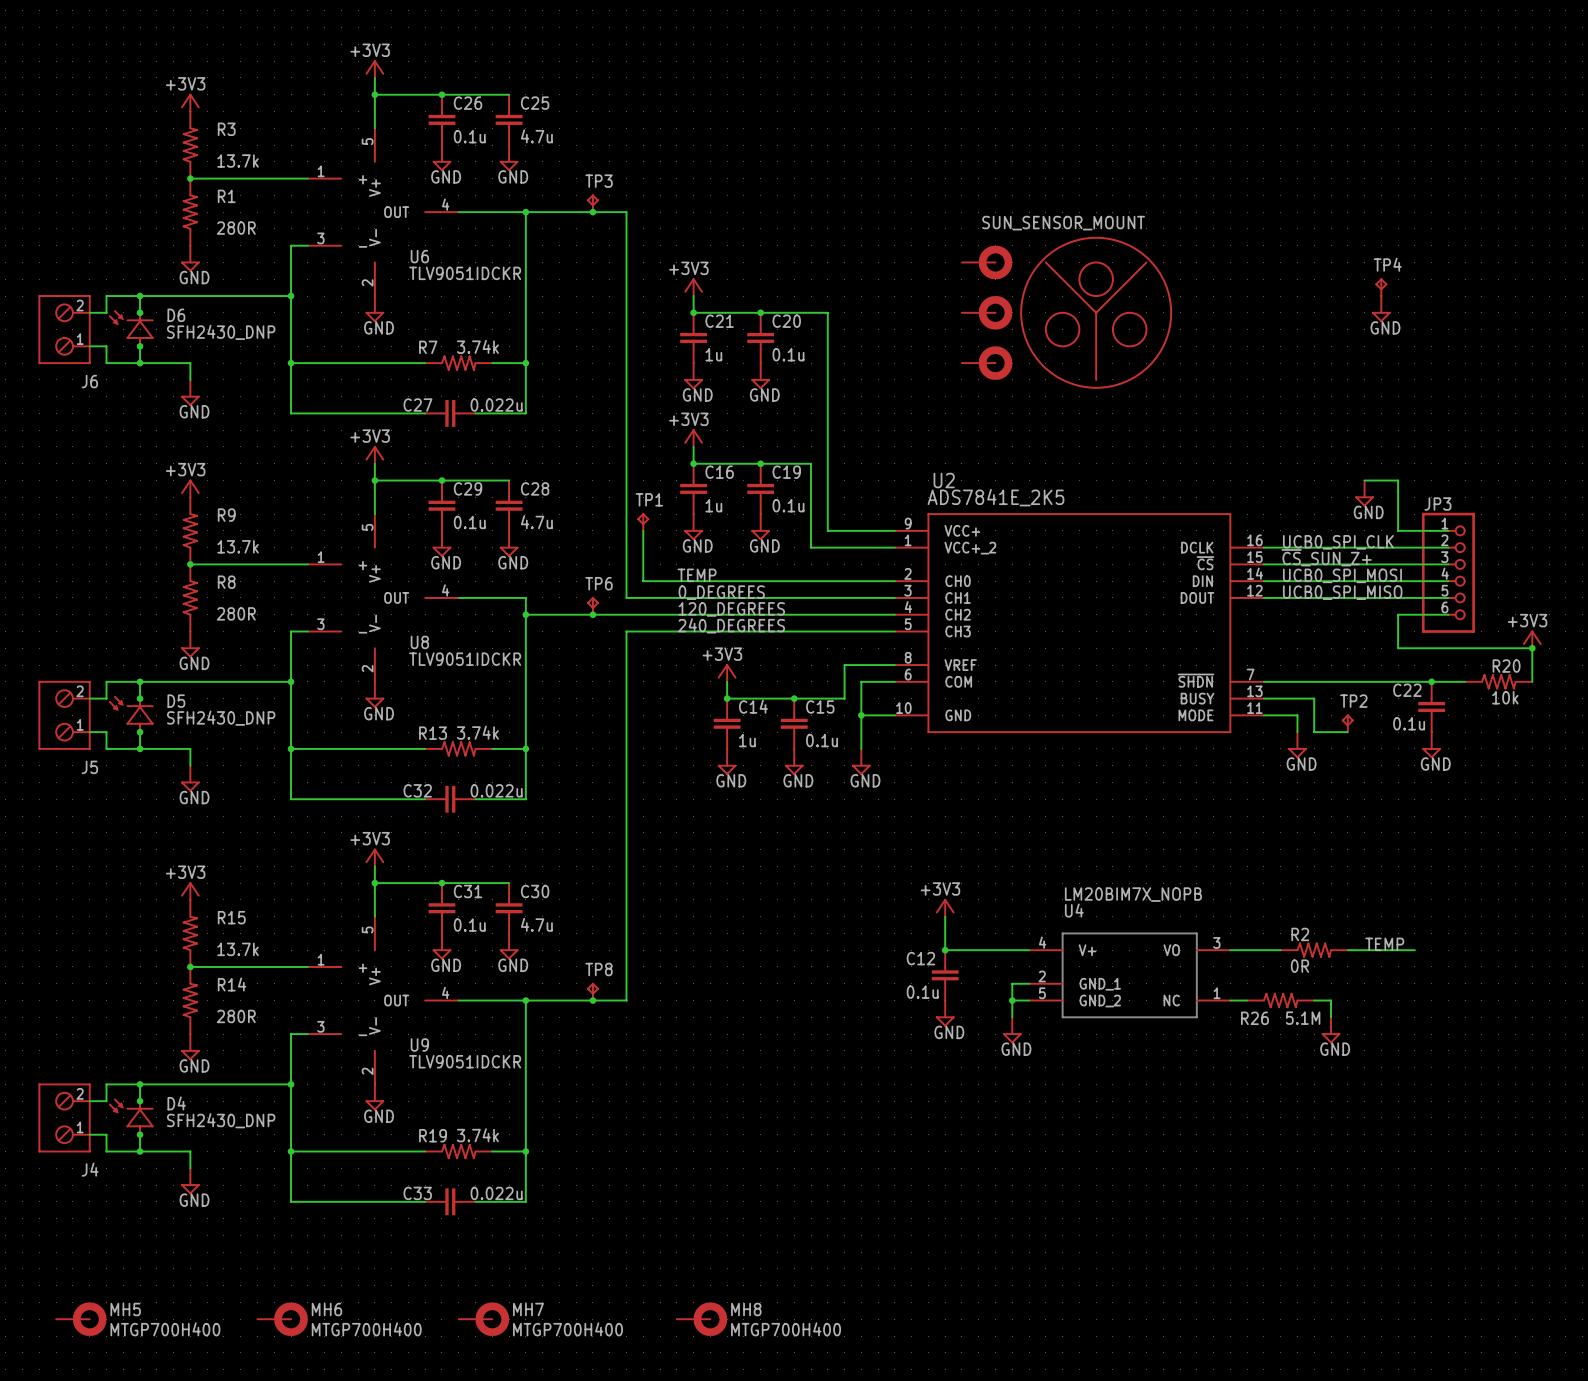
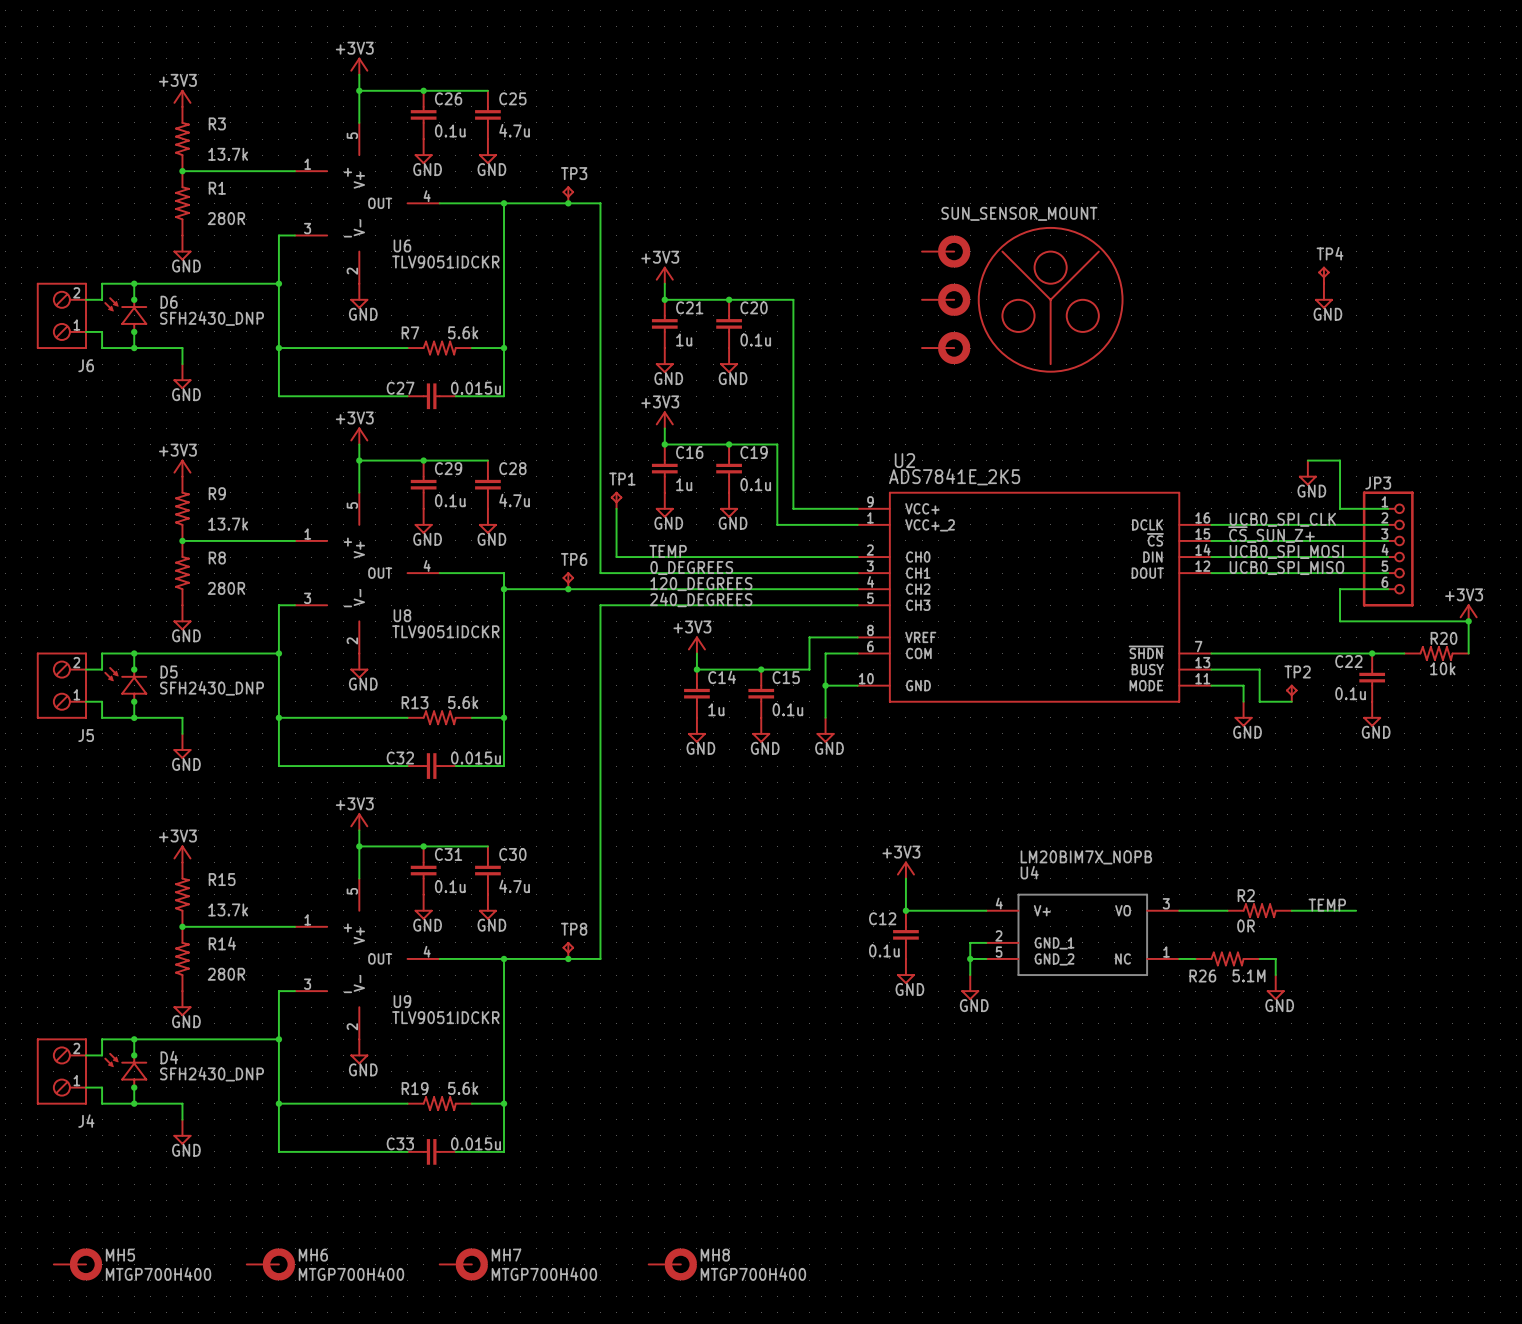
R7 value: 3.74k (477, 346) -> 5.6k (463, 332)
C27 value: 0.022u (496, 405) -> 0.015u (475, 388)
R13 value: 3.74k (477, 732) -> 5.6k (463, 702)
C32 value: 0.022u (496, 790) -> 0.015u (475, 758)
R19 value: 3.74k (477, 1135) -> 5.6k (463, 1088)
C33 value: 0.022u (496, 1193) -> 0.015u (475, 1143)

